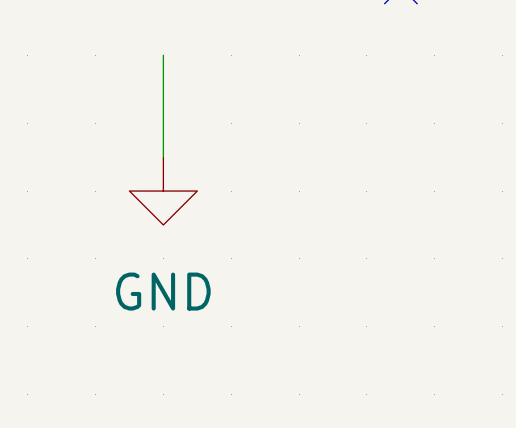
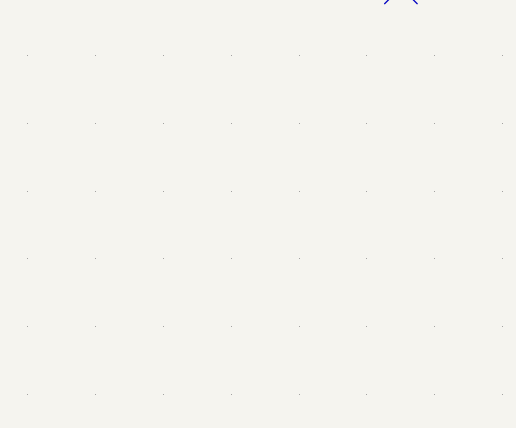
wire: (163, 55) (163, 157) -> none
power symbol: GND (163, 191) -> none

